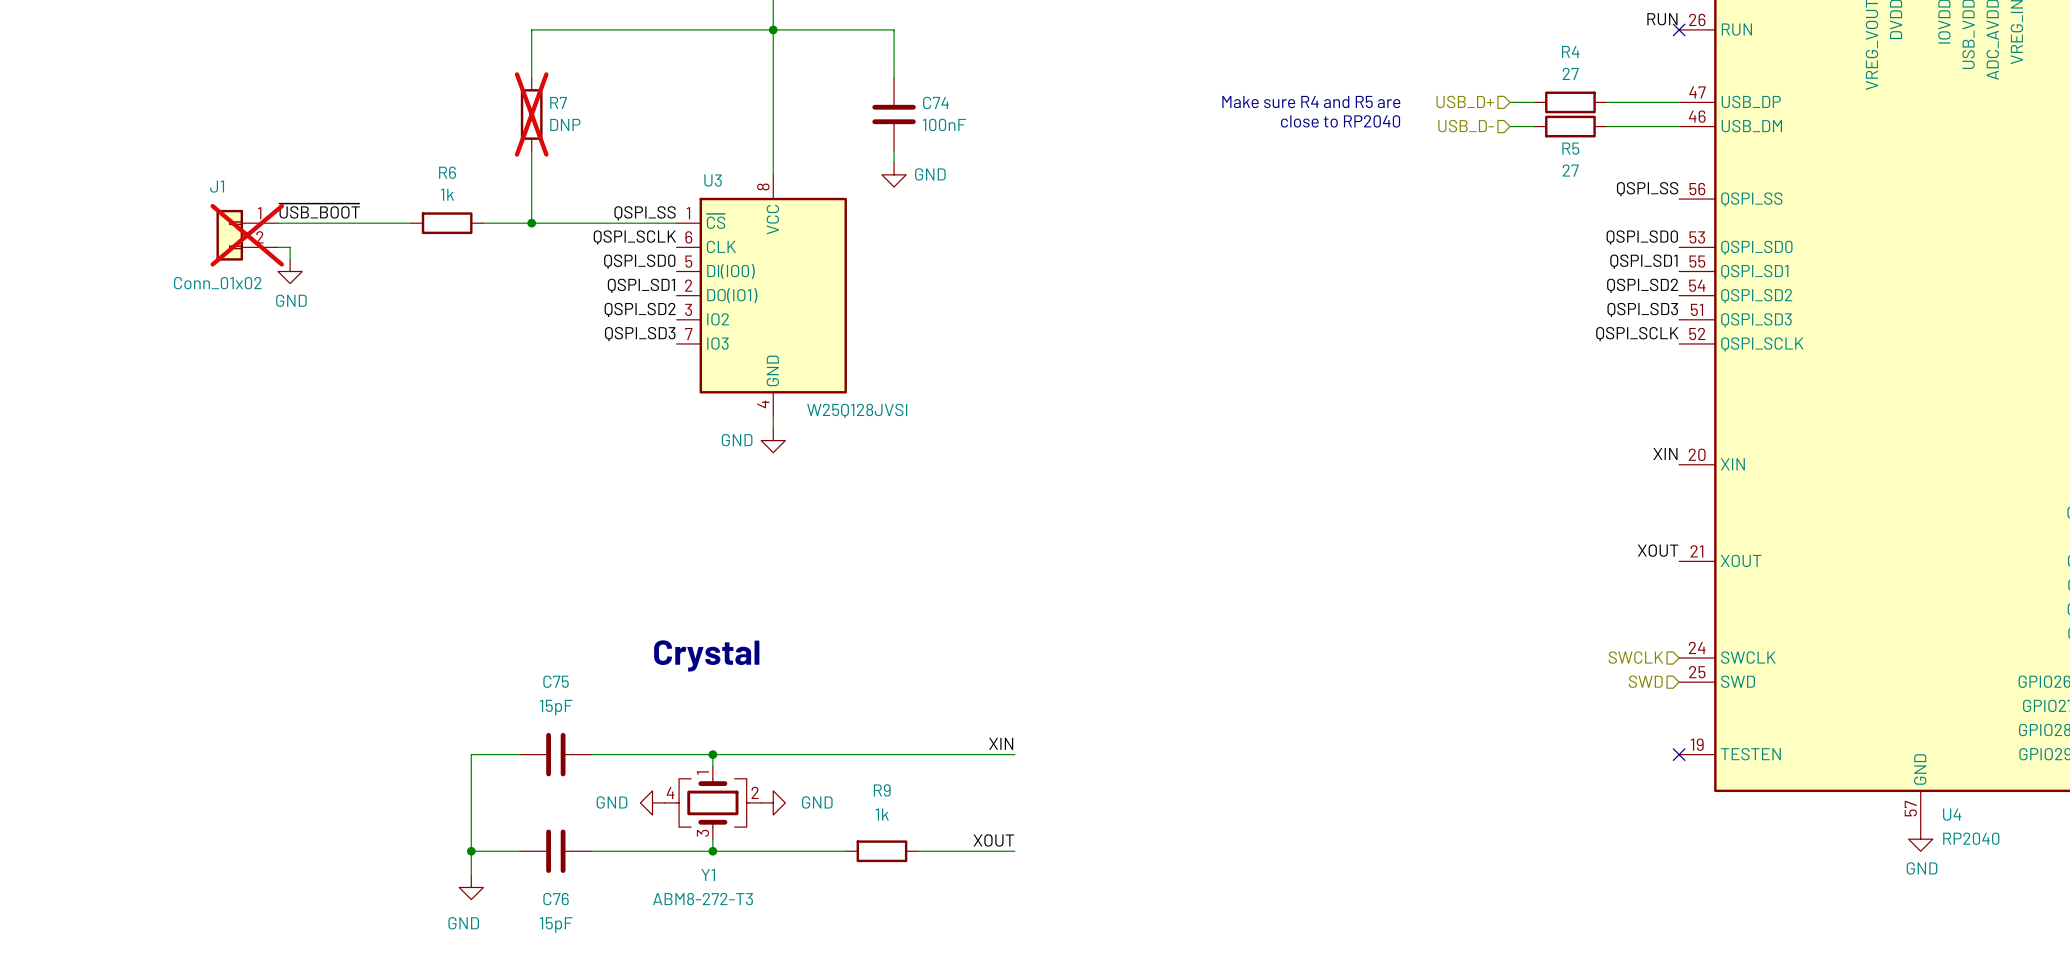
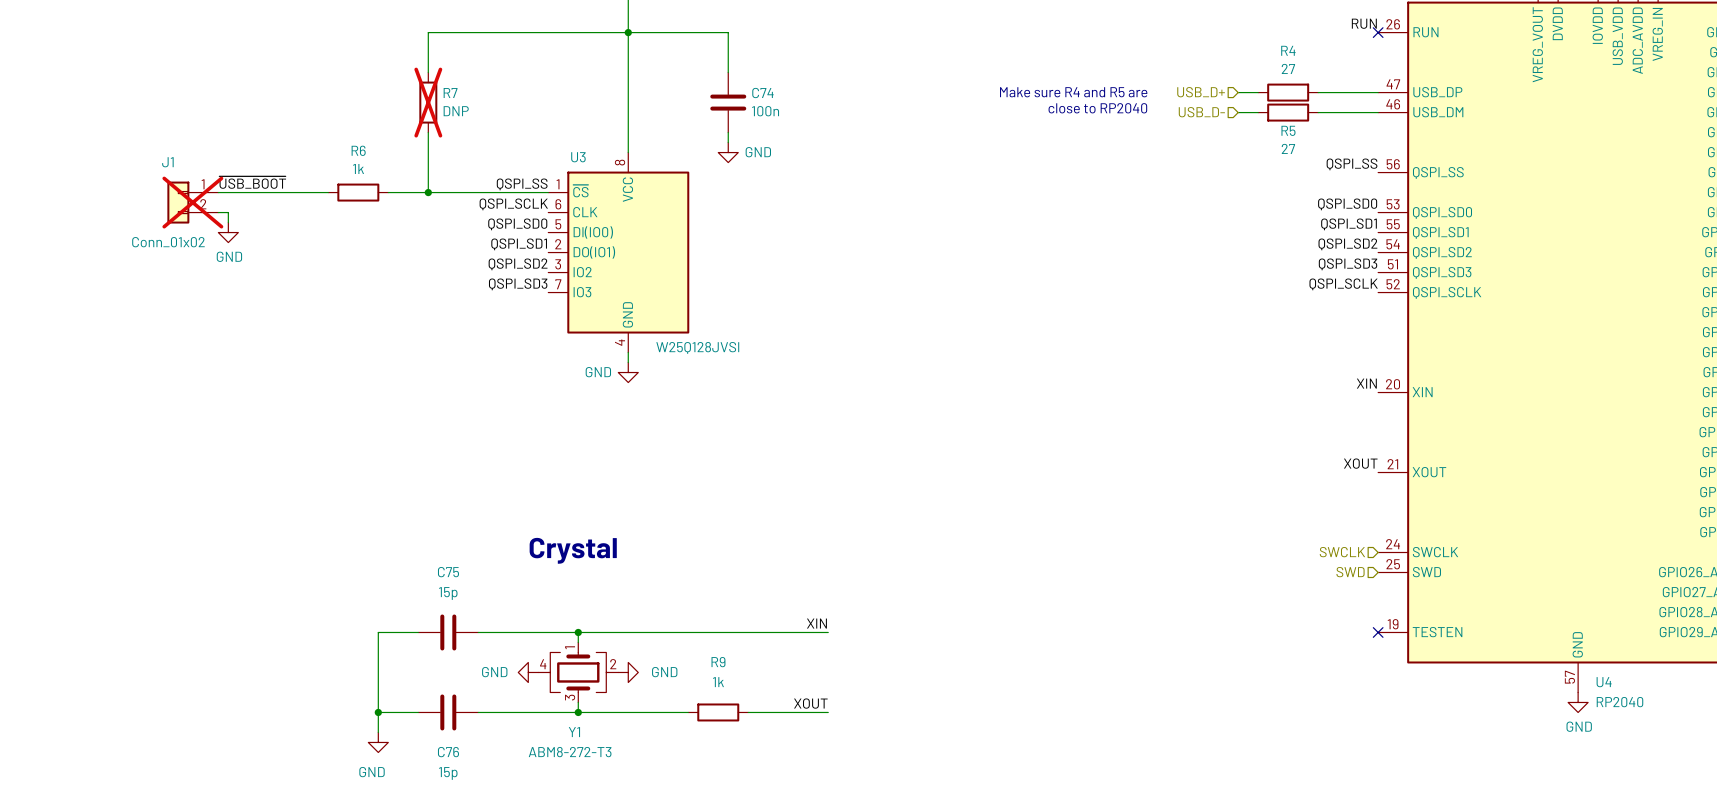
C74 value: 100nF (944, 124) -> 100n (765, 111)
C75 value: 15pF (556, 707) -> 15p (448, 593)
C76 value: 15pF (556, 924) -> 15p (448, 773)

